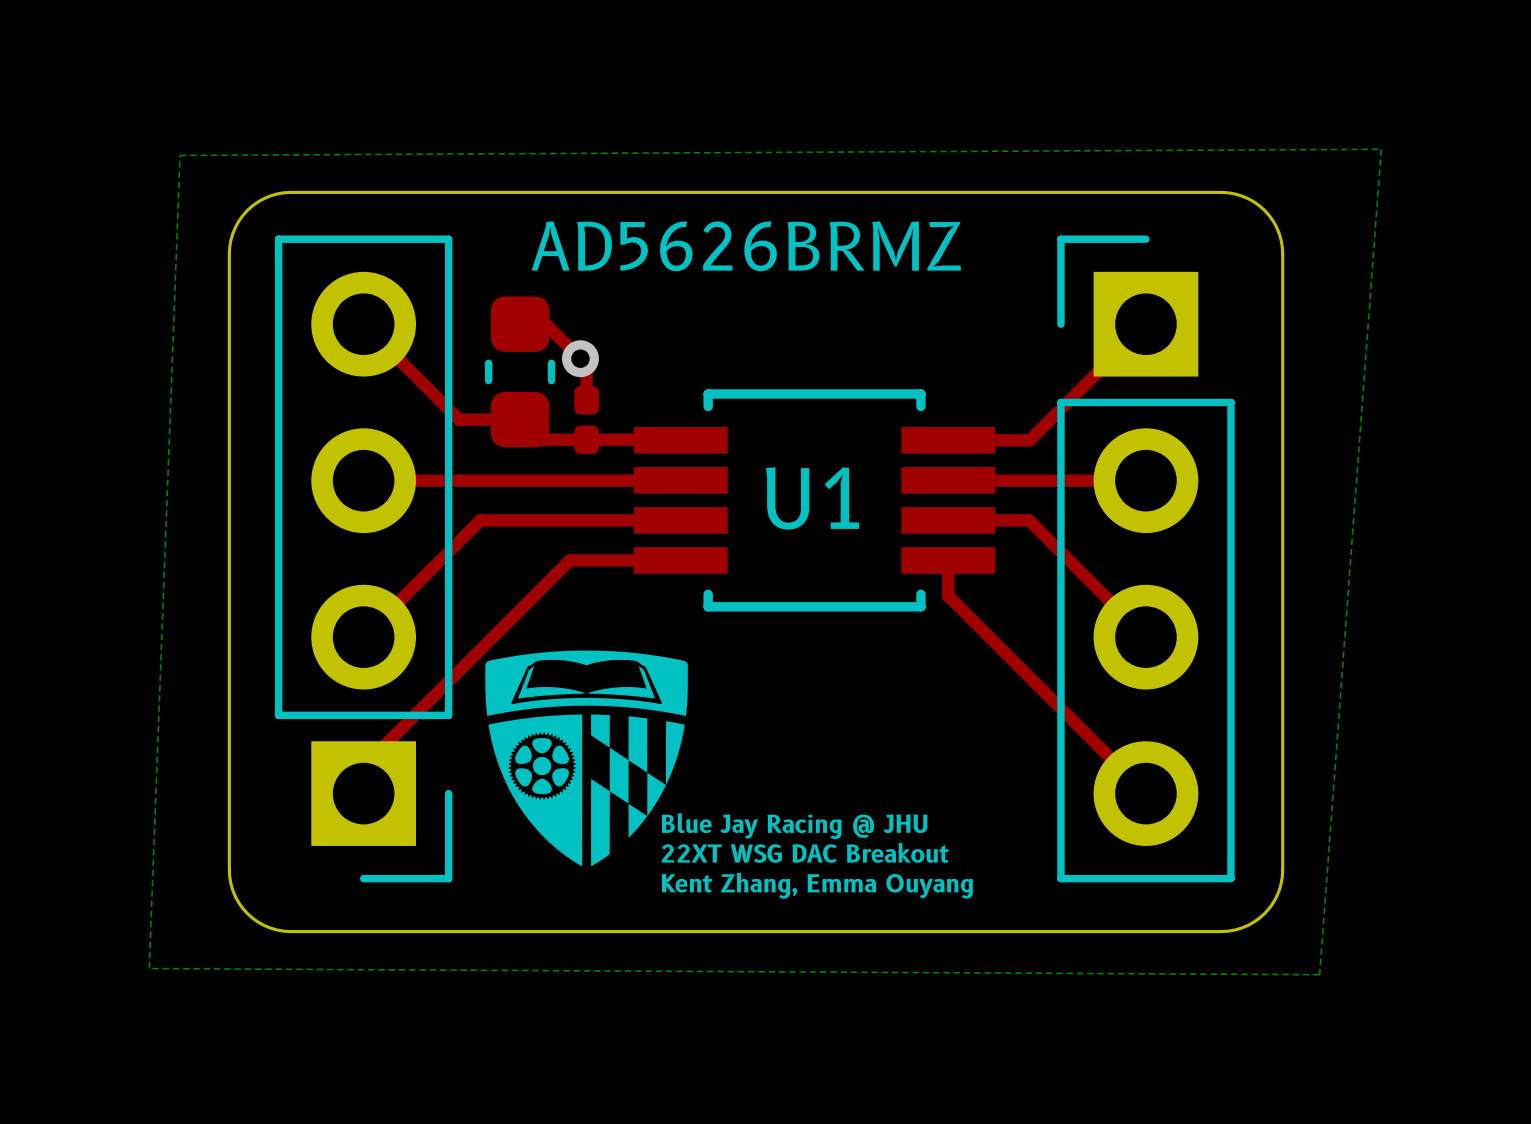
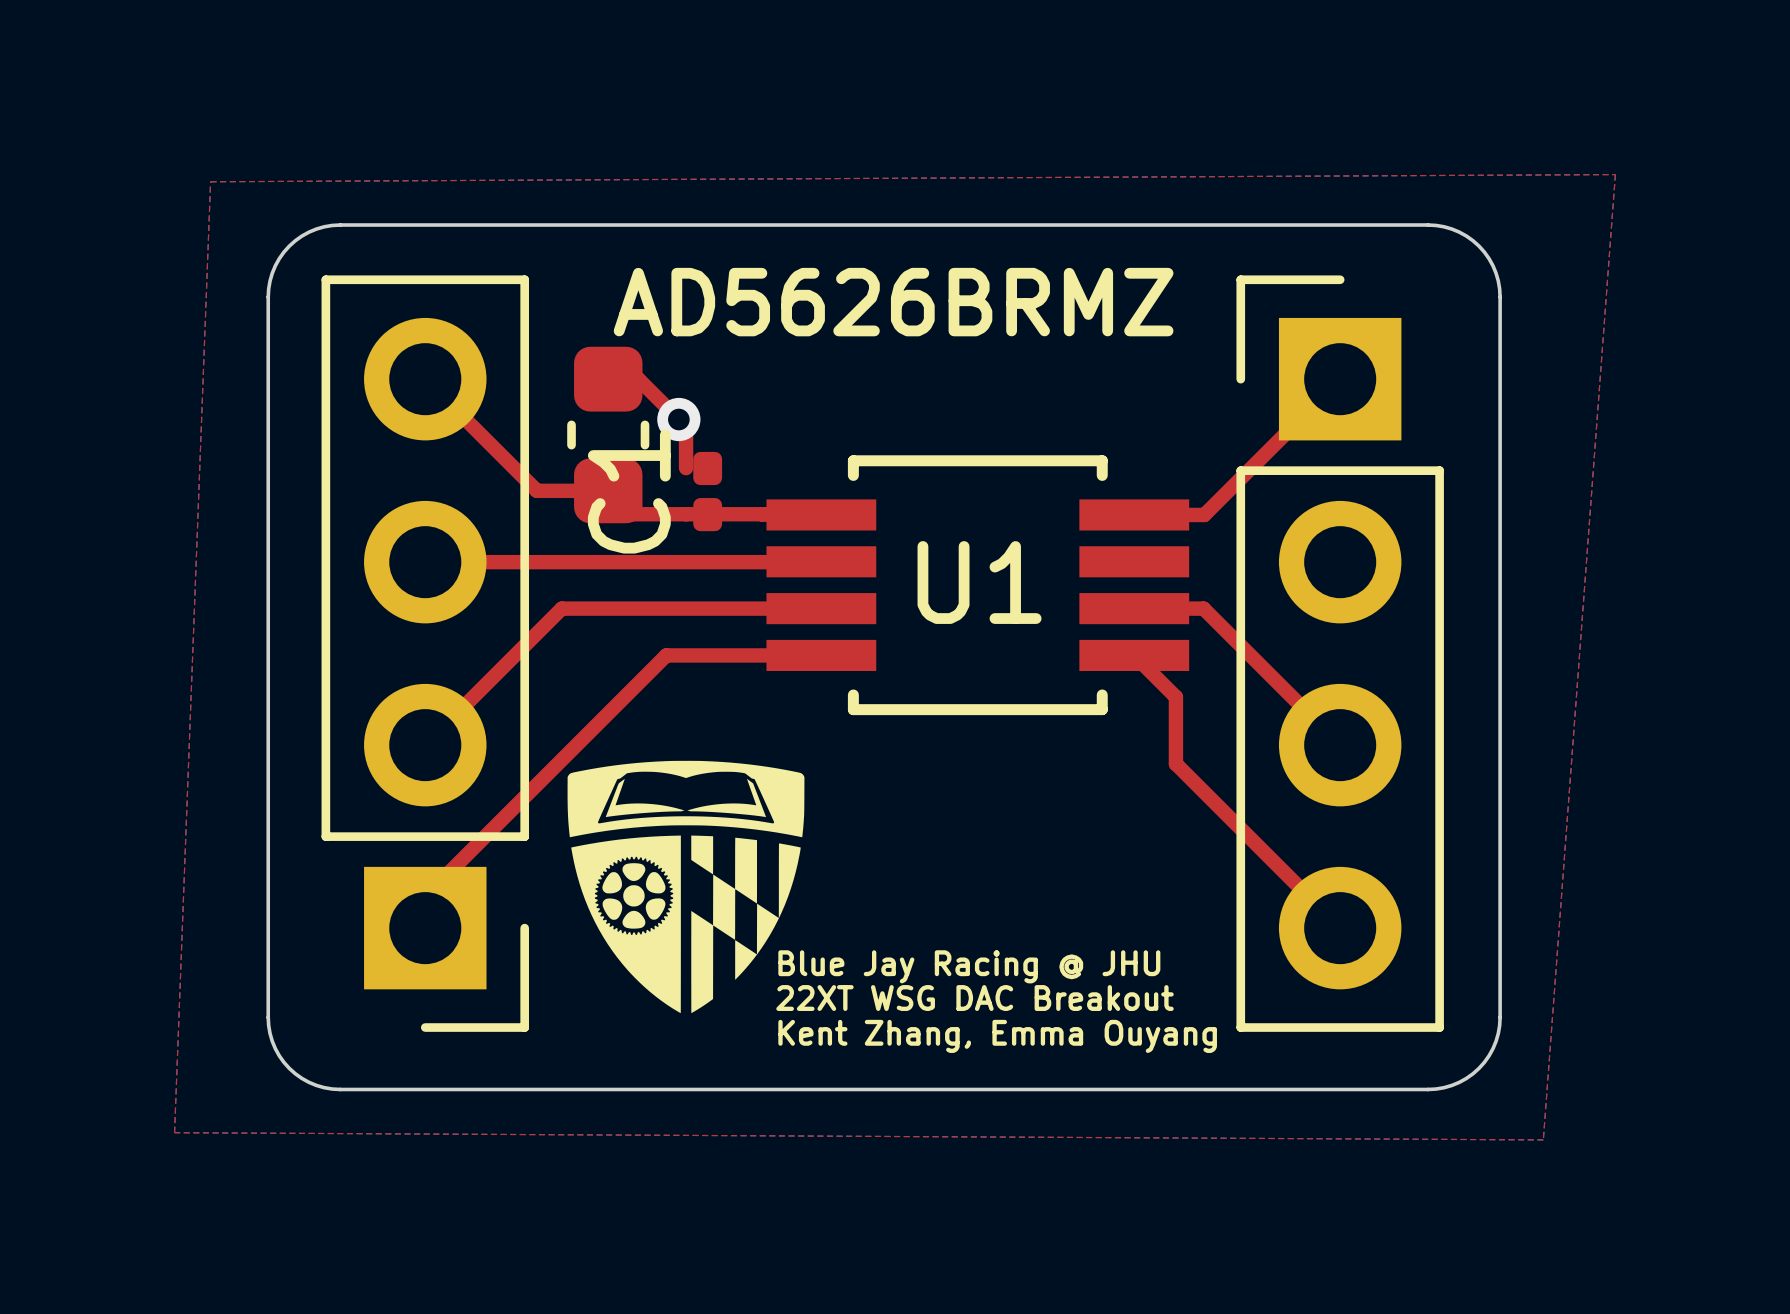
top zone outline: none -> (1615, 174) (210, 181) (174, 1132) (1543, 1139) (1615, 174)
U1 value position: AD5626BRMZ (746, 246) -> AD5626BRMZ (893, 302)
C1 position: (586, 420) -> (707, 491)
C1 name: none -> C1 (629, 491)
top track: (948, 480) (1145, 480) -> none
U1 position: (814, 500) -> (977, 585)
top track: (948, 560) (948, 595) (1005, 653) -> (1134, 655) (1175, 697) (1175, 763)

